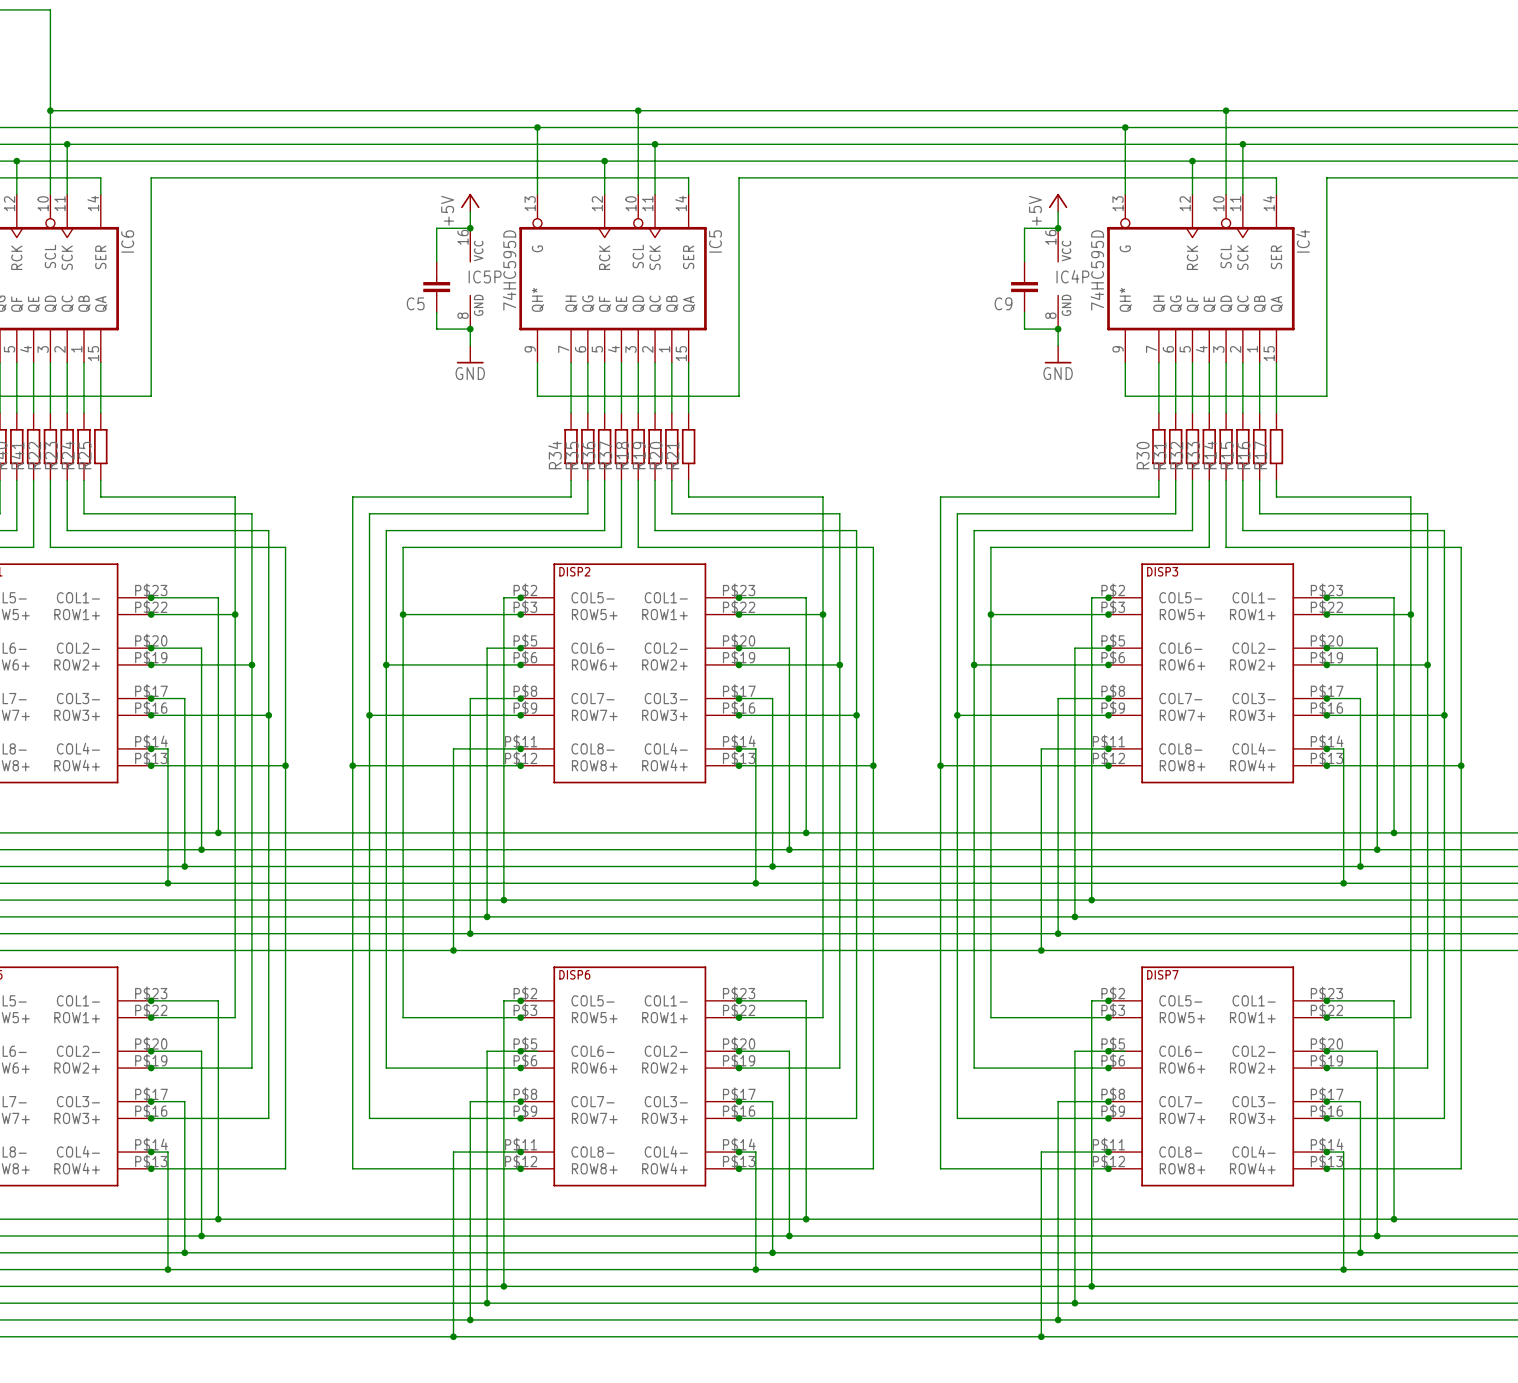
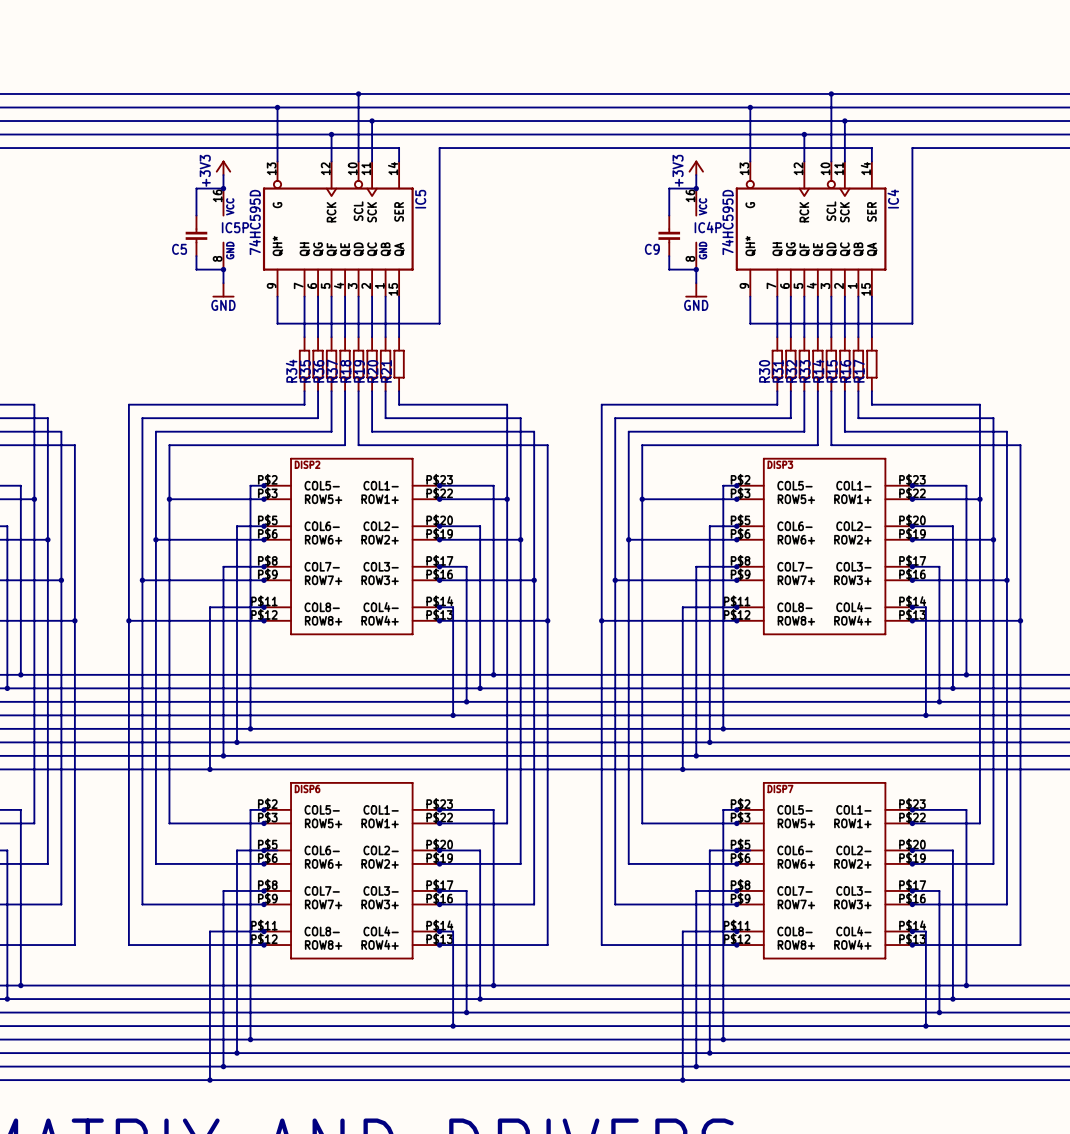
power symbol: +5V (470, 202) -> +3V3 (223, 167)
power symbol: +5V (1058, 202) -> +3V3 (696, 167)

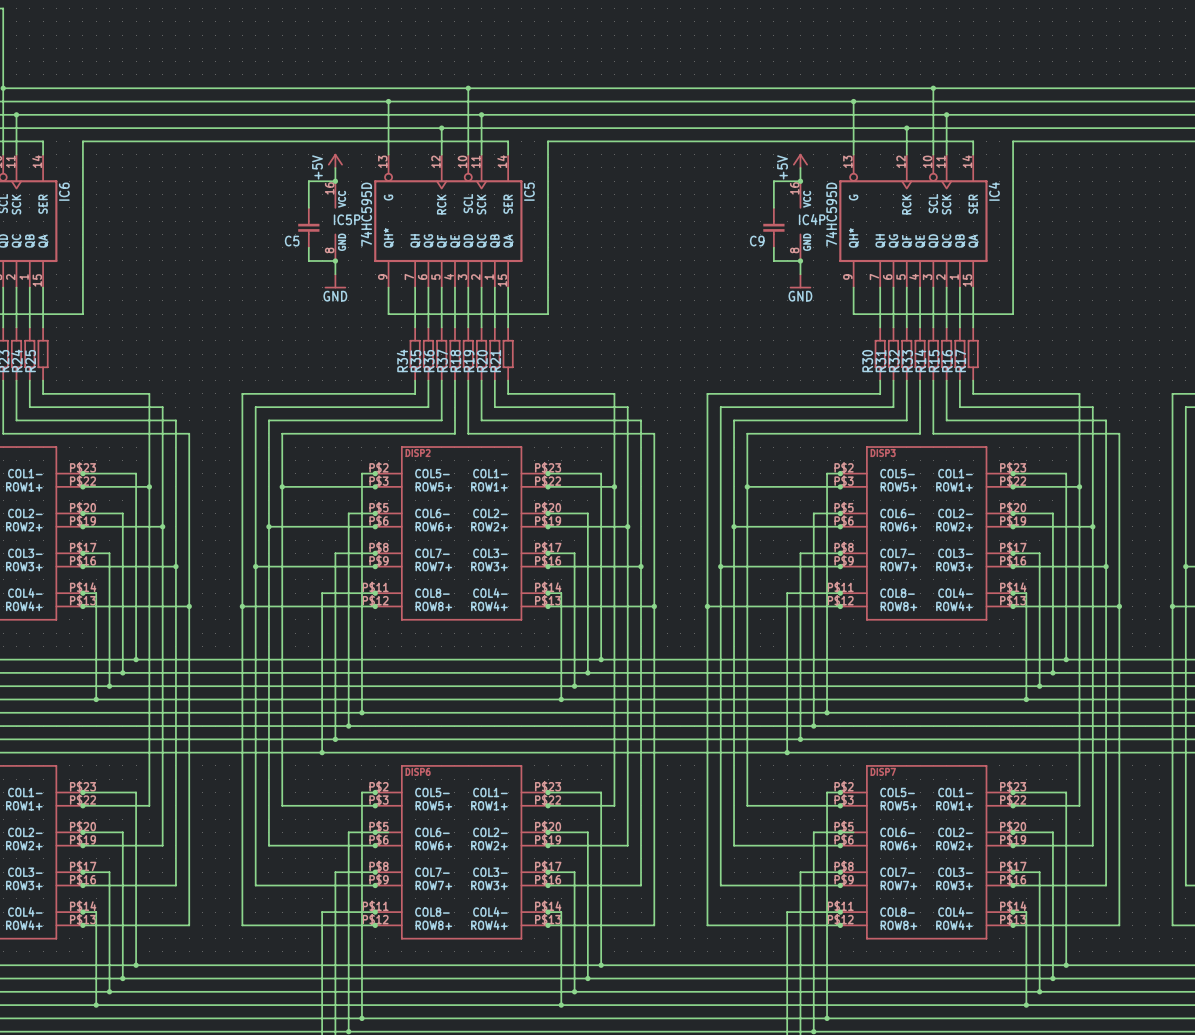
power symbol: +3V3 (223, 167) -> +5V (335, 161)
power symbol: +3V3 (696, 167) -> +5V (800, 161)

